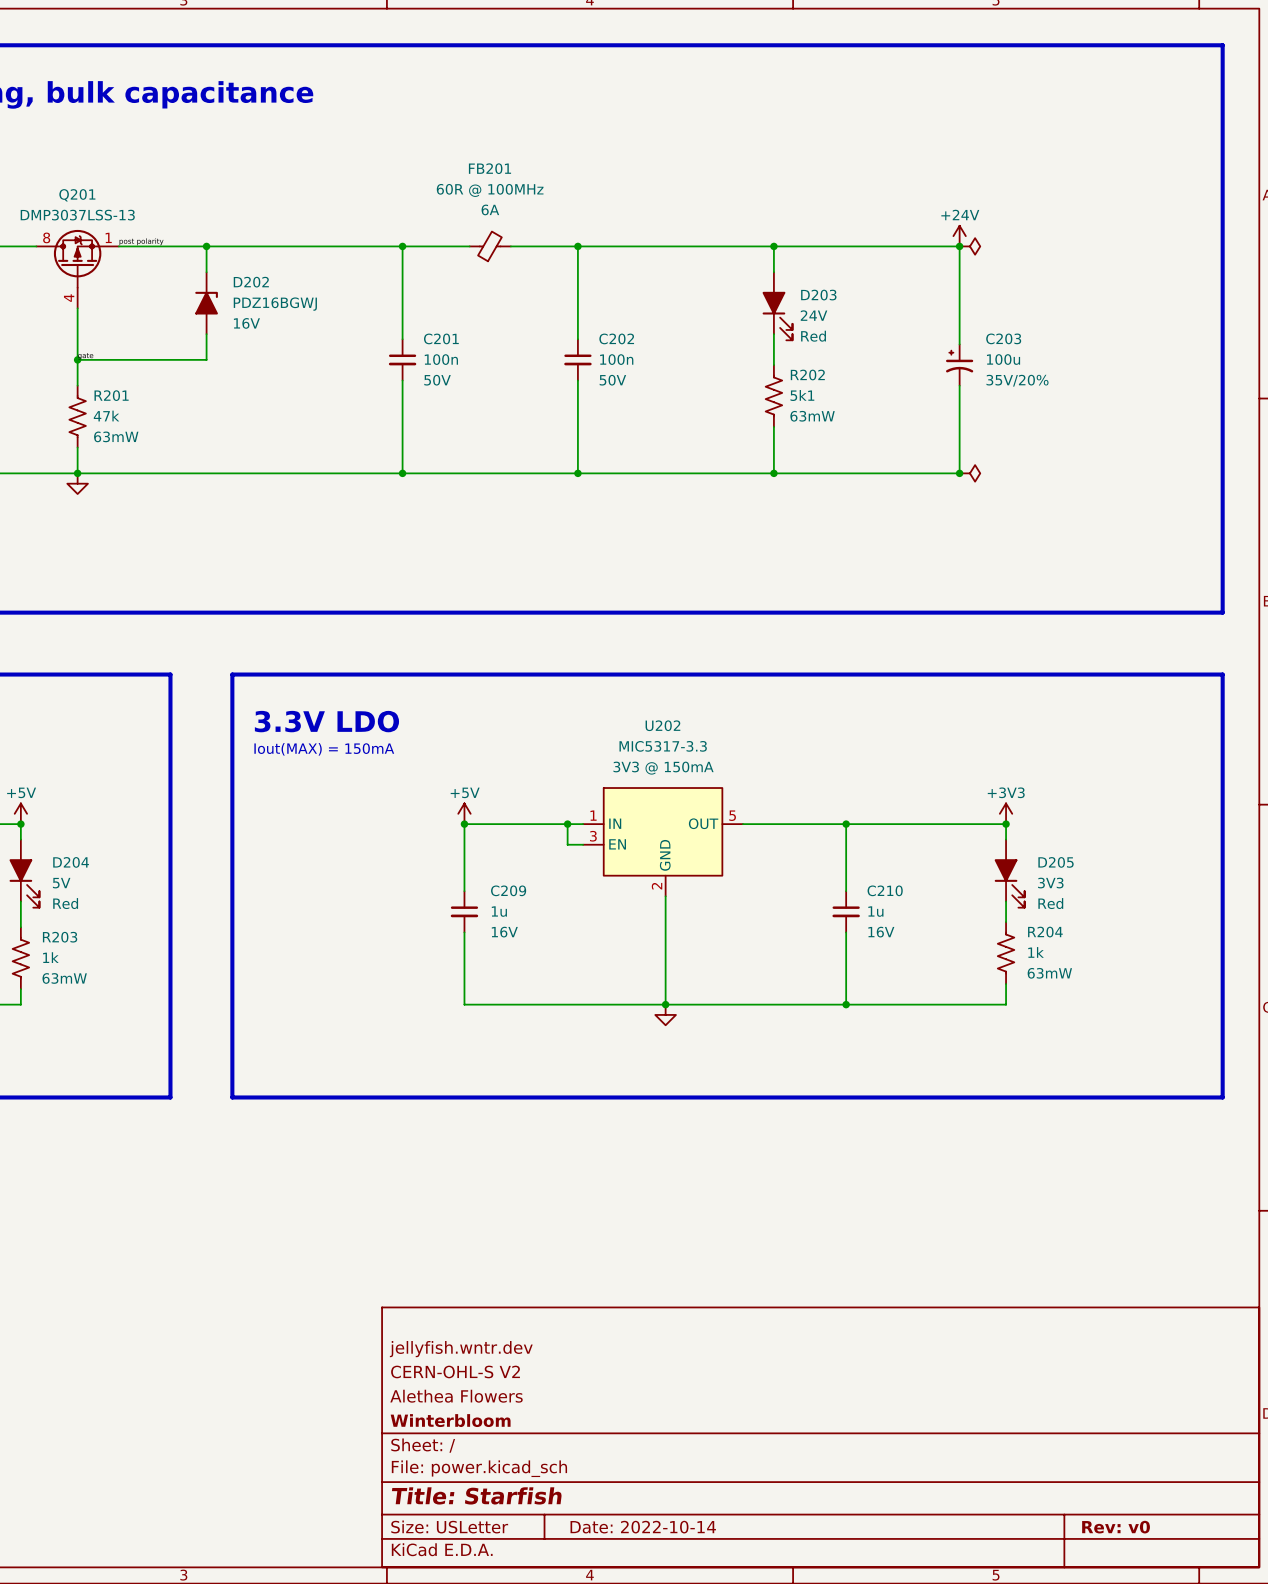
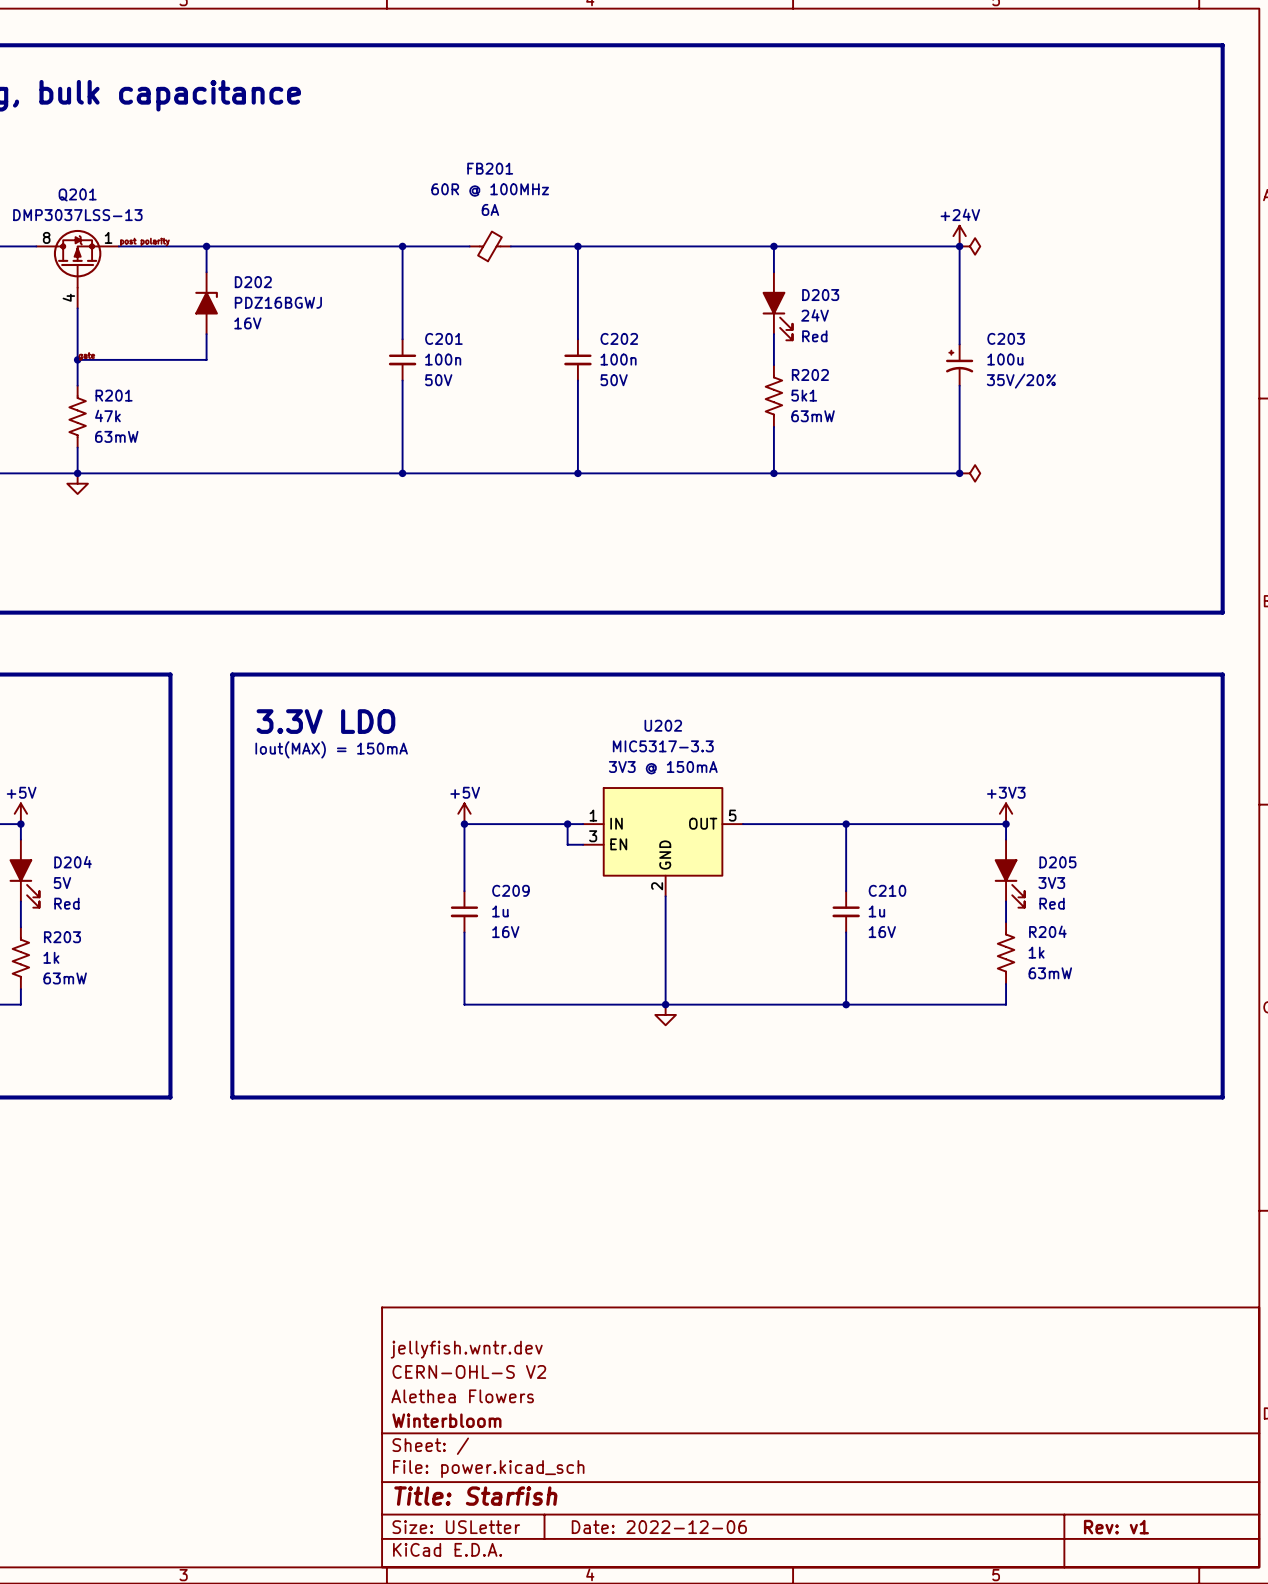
title block: Date: 2022-10-14 (643, 1527) -> Date: 2022-12-06 (659, 1527)
title block: Rev: v0 (1116, 1527) -> Rev: v1 (1116, 1527)

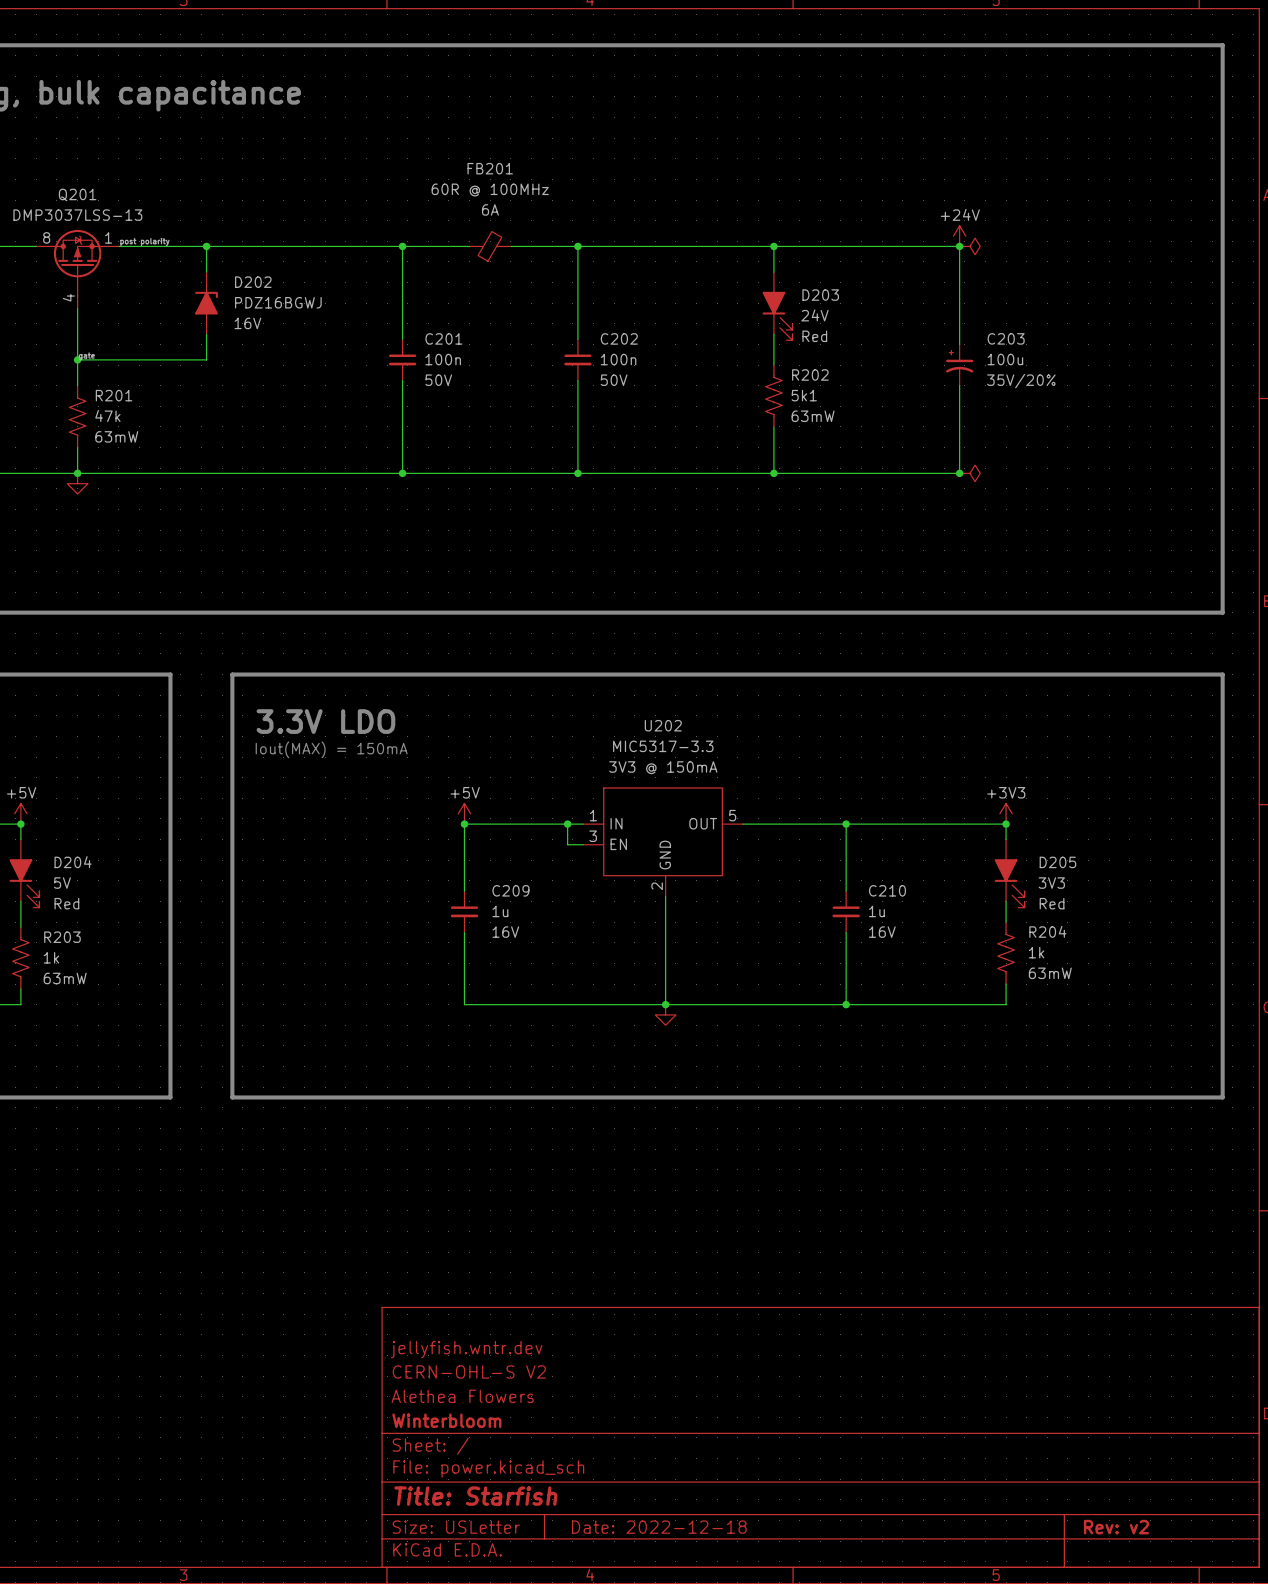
title block: Date: 2022-12-06 (659, 1527) -> Date: 2022-12-18 (659, 1527)
title block: Rev: v1 (1116, 1527) -> Rev: v2 (1116, 1527)

